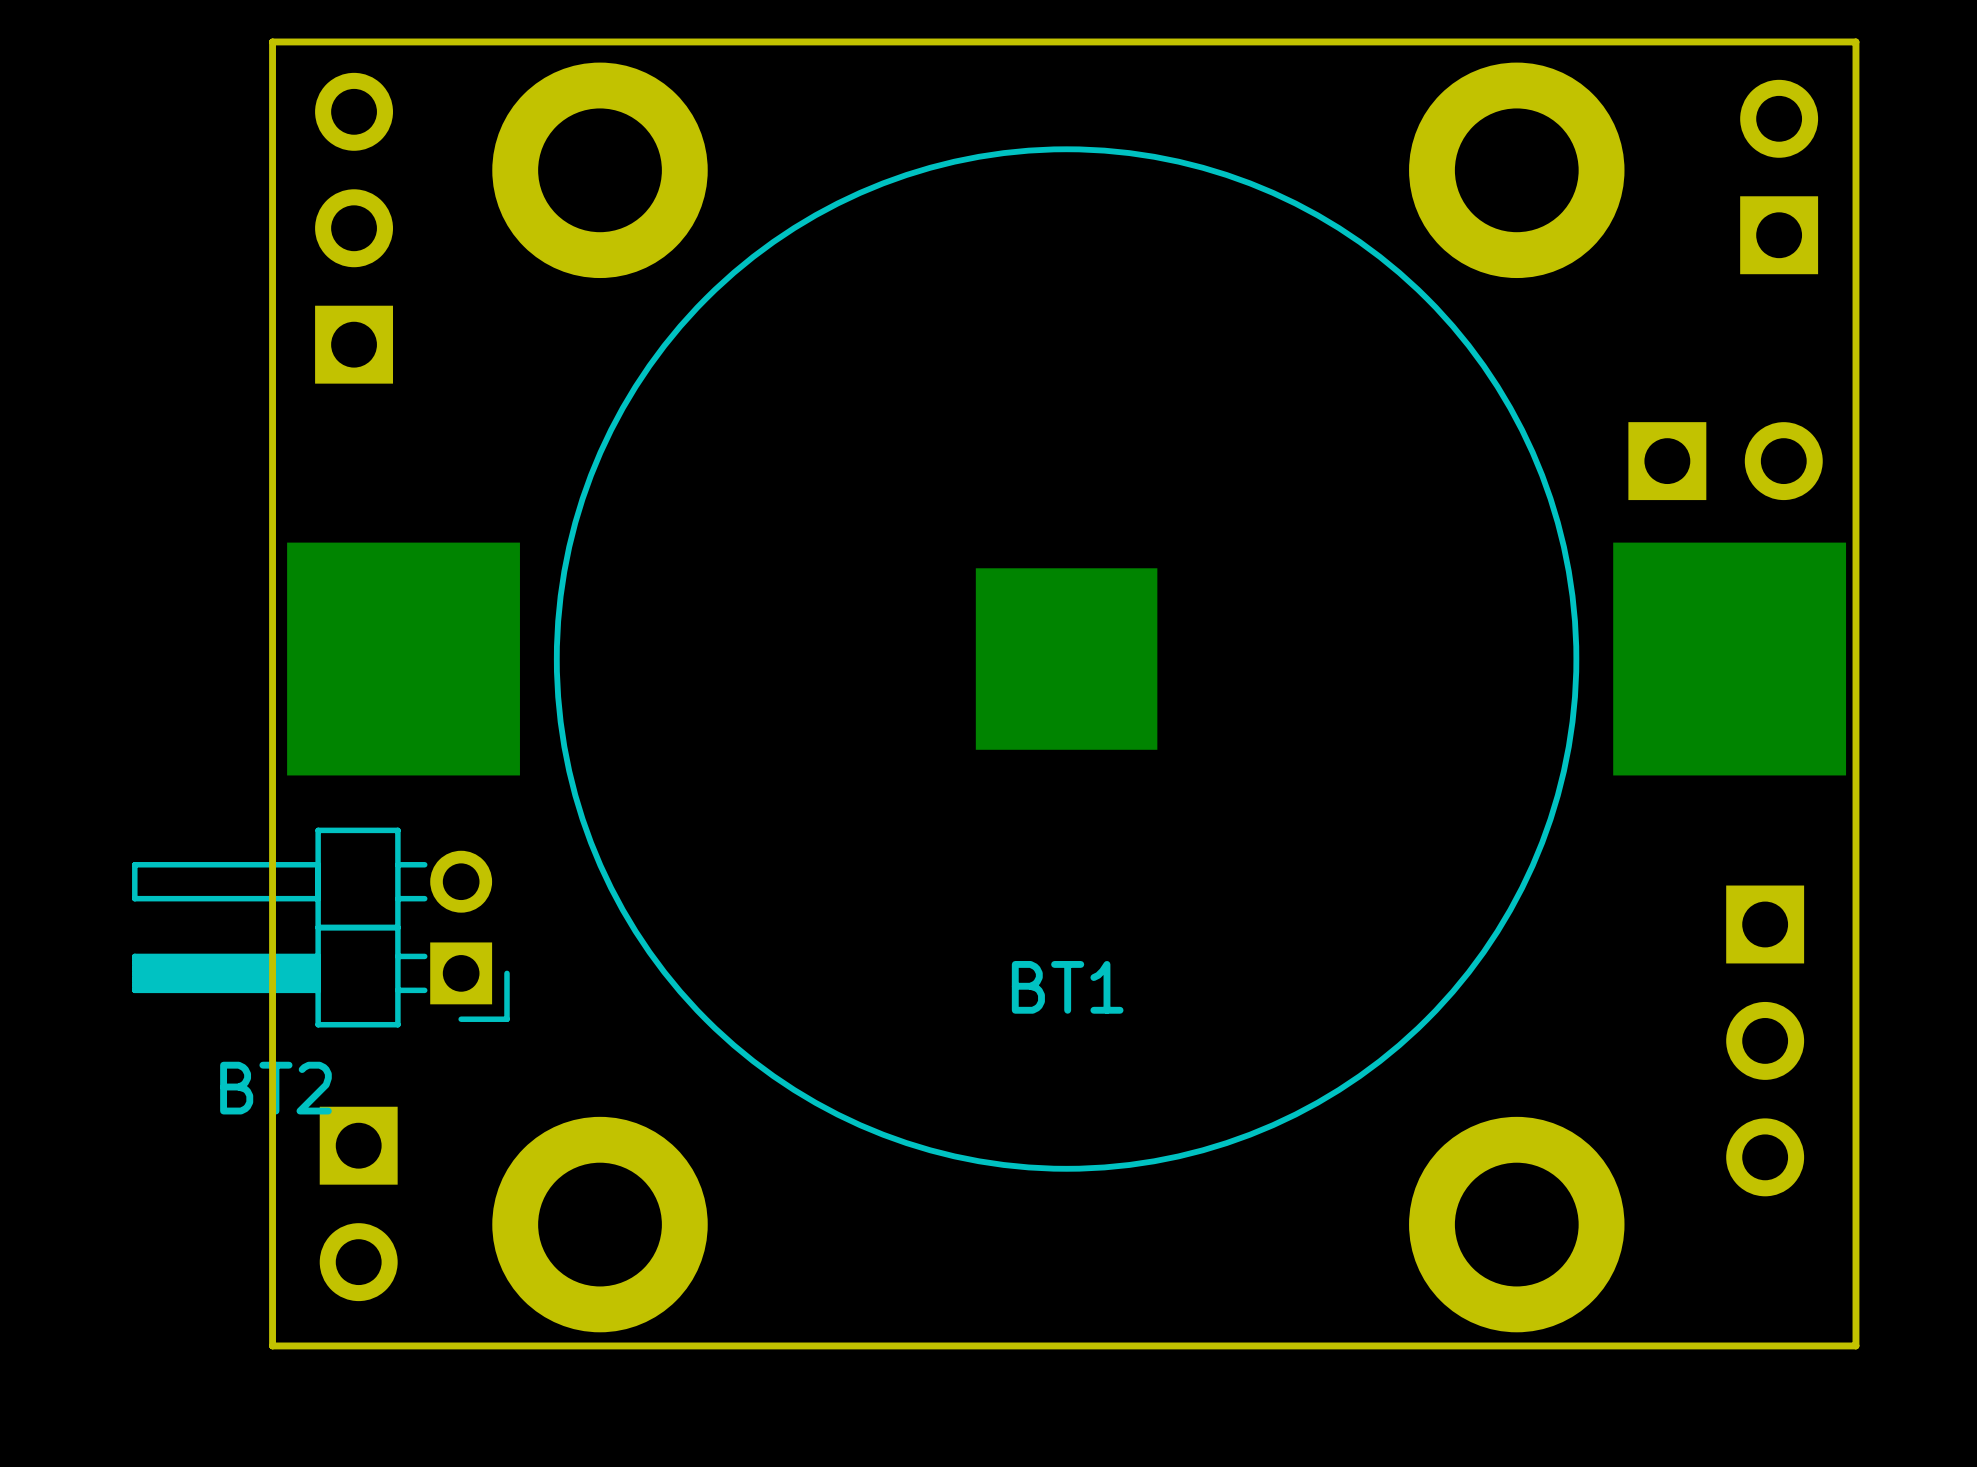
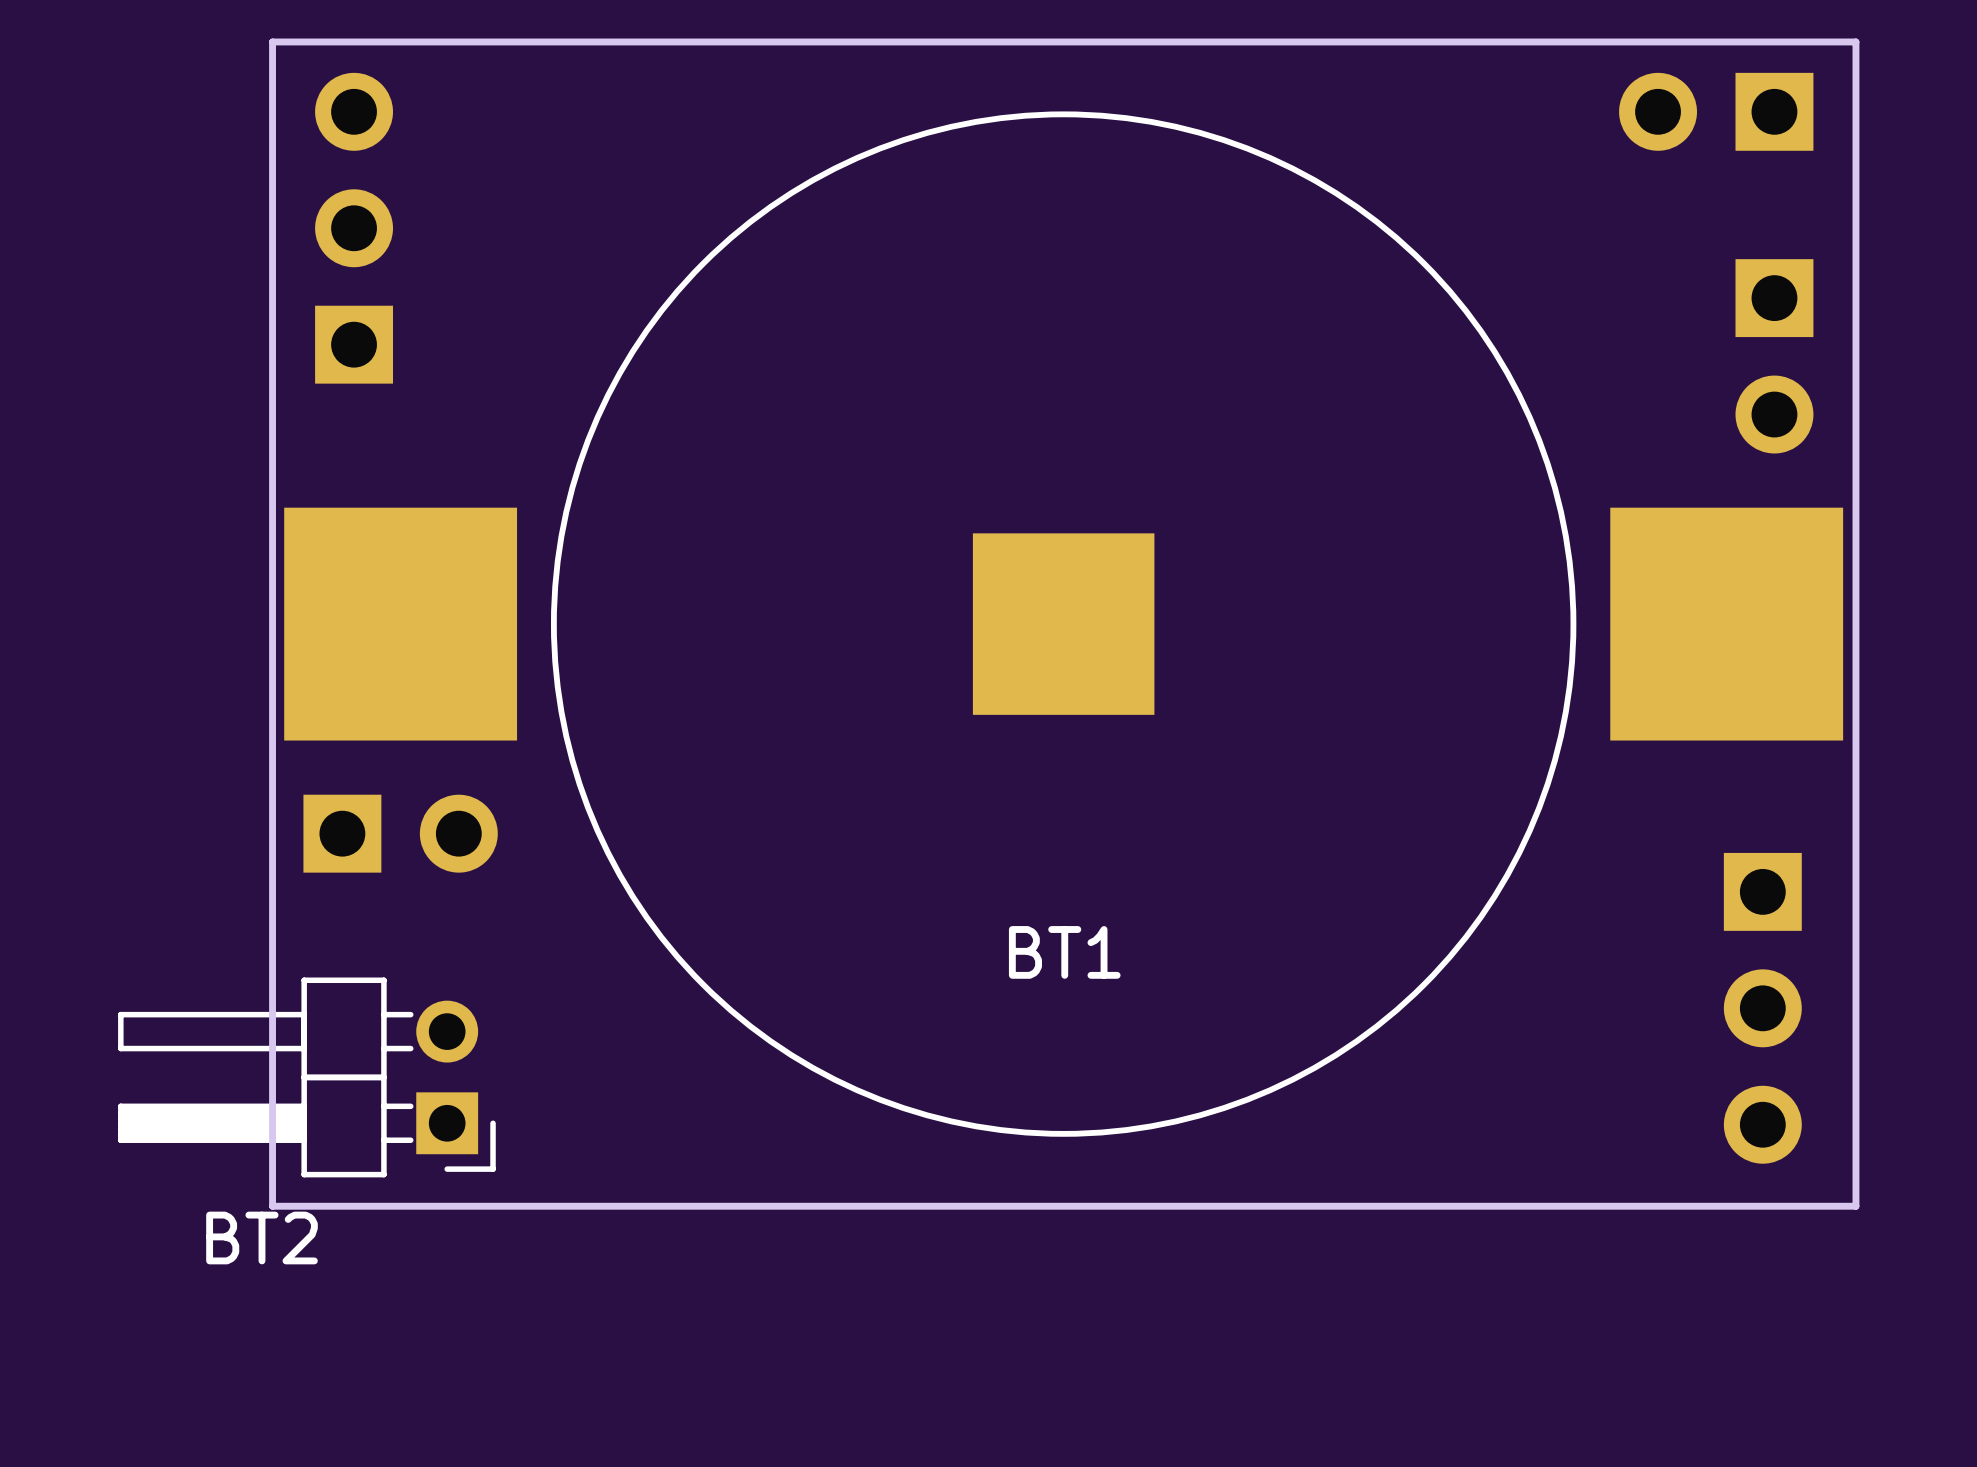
part: none -> (1716, 111)
part: (600, 170) -> none
part: (1516, 170) -> none
part: (1779, 177) -> none
part: none -> (1774, 356)
part: (1725, 461) -> none
BT1 position: (1066, 659) -> (1063, 624)
BT2 position: (320, 927) -> (306, 1077)
part position: (1765, 1040) -> (1762, 1008)
part rotation: 0° (358, 1203) -> 90° counterclockwise (400, 833)
part position: (358, 1203) -> (400, 833)
board edge: (1855, 1206) (1855, 1345) (272, 1345) (272, 1206) -> (1855, 1206) (272, 1206)
part: (600, 1224) -> none
part: (1516, 1224) -> none

